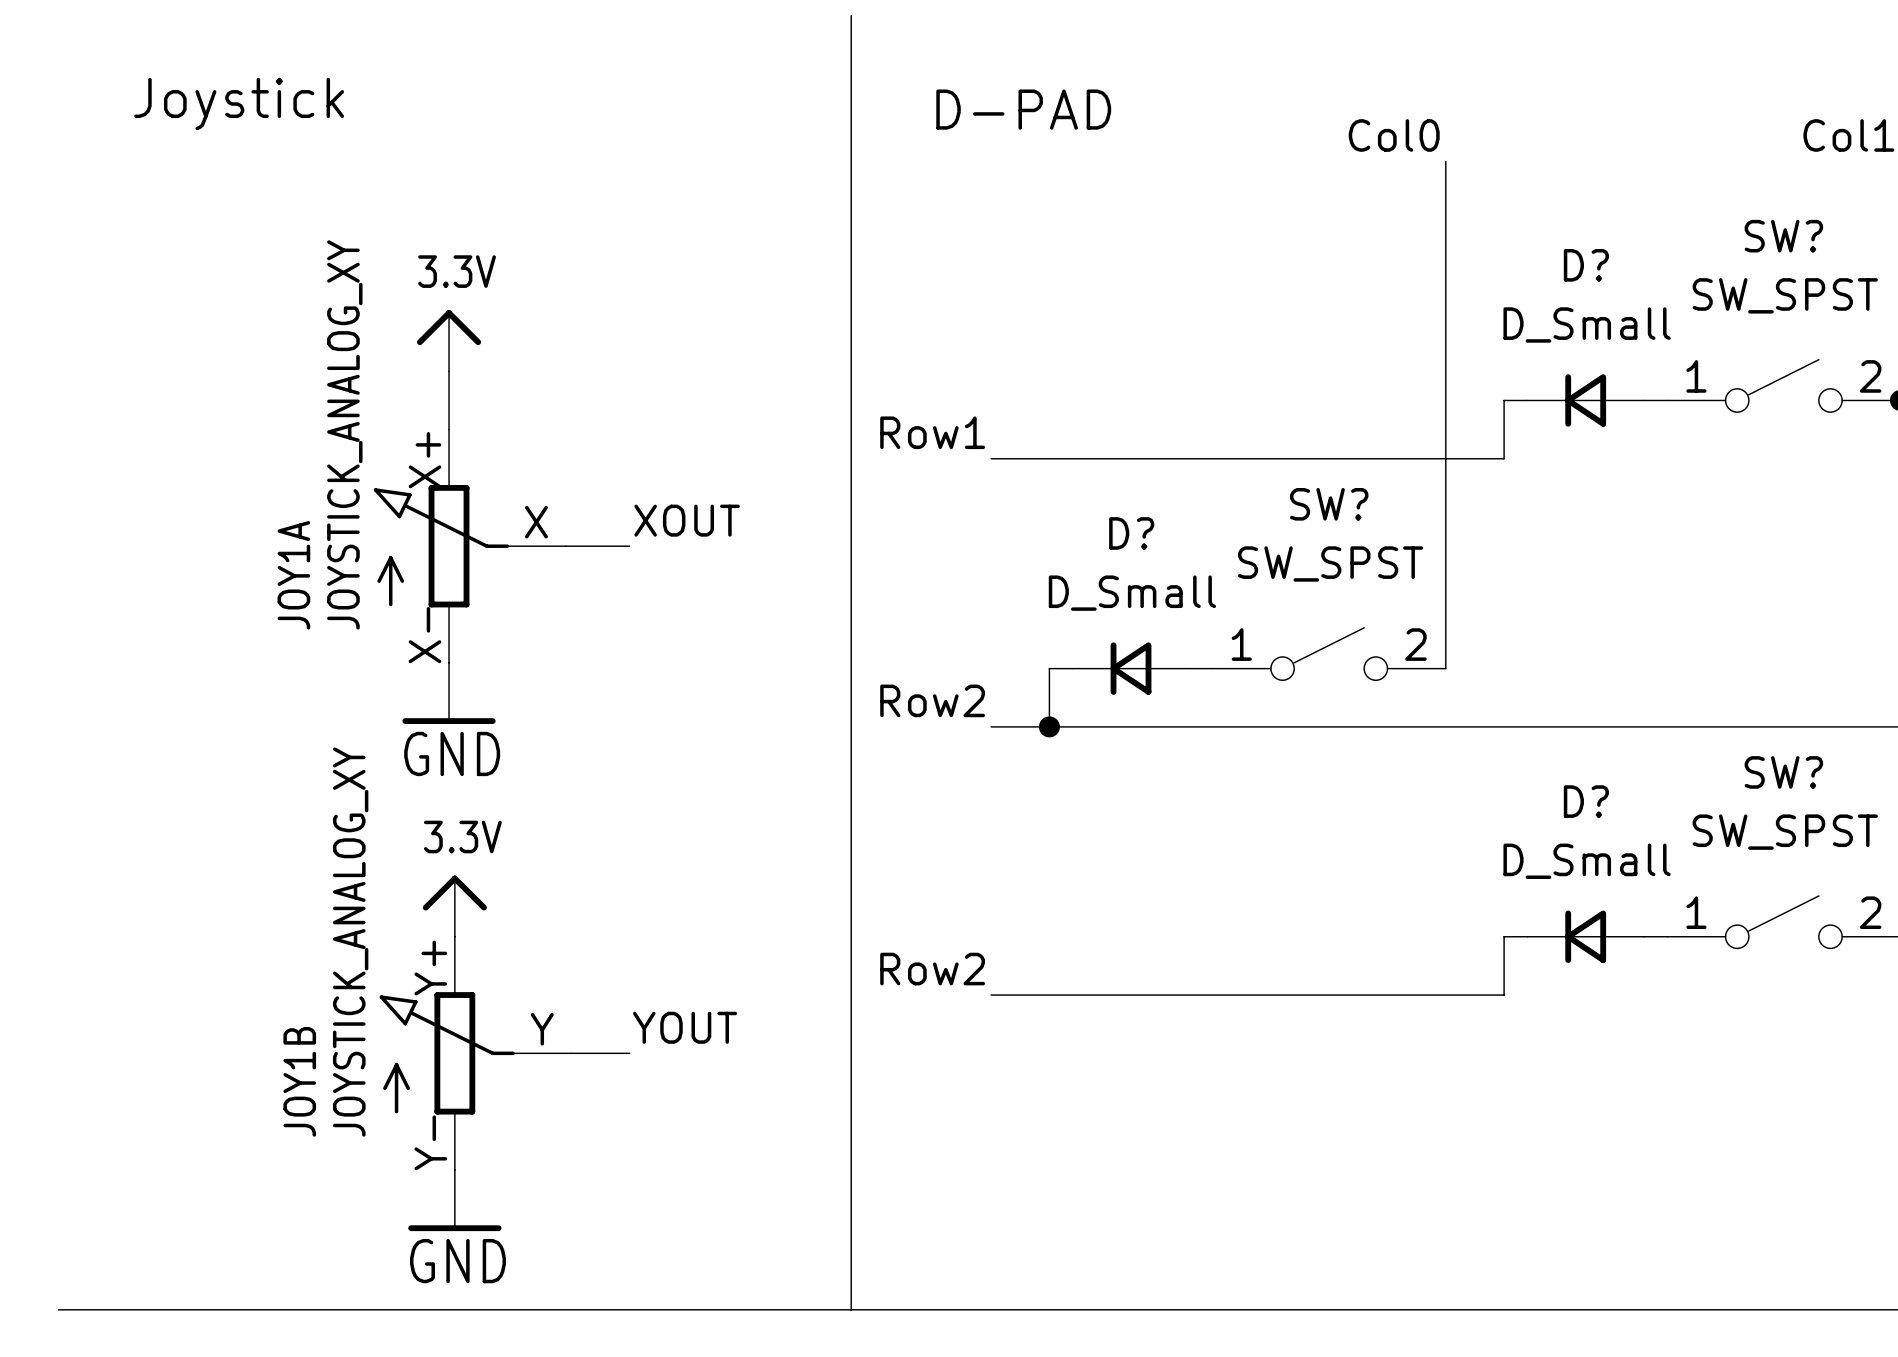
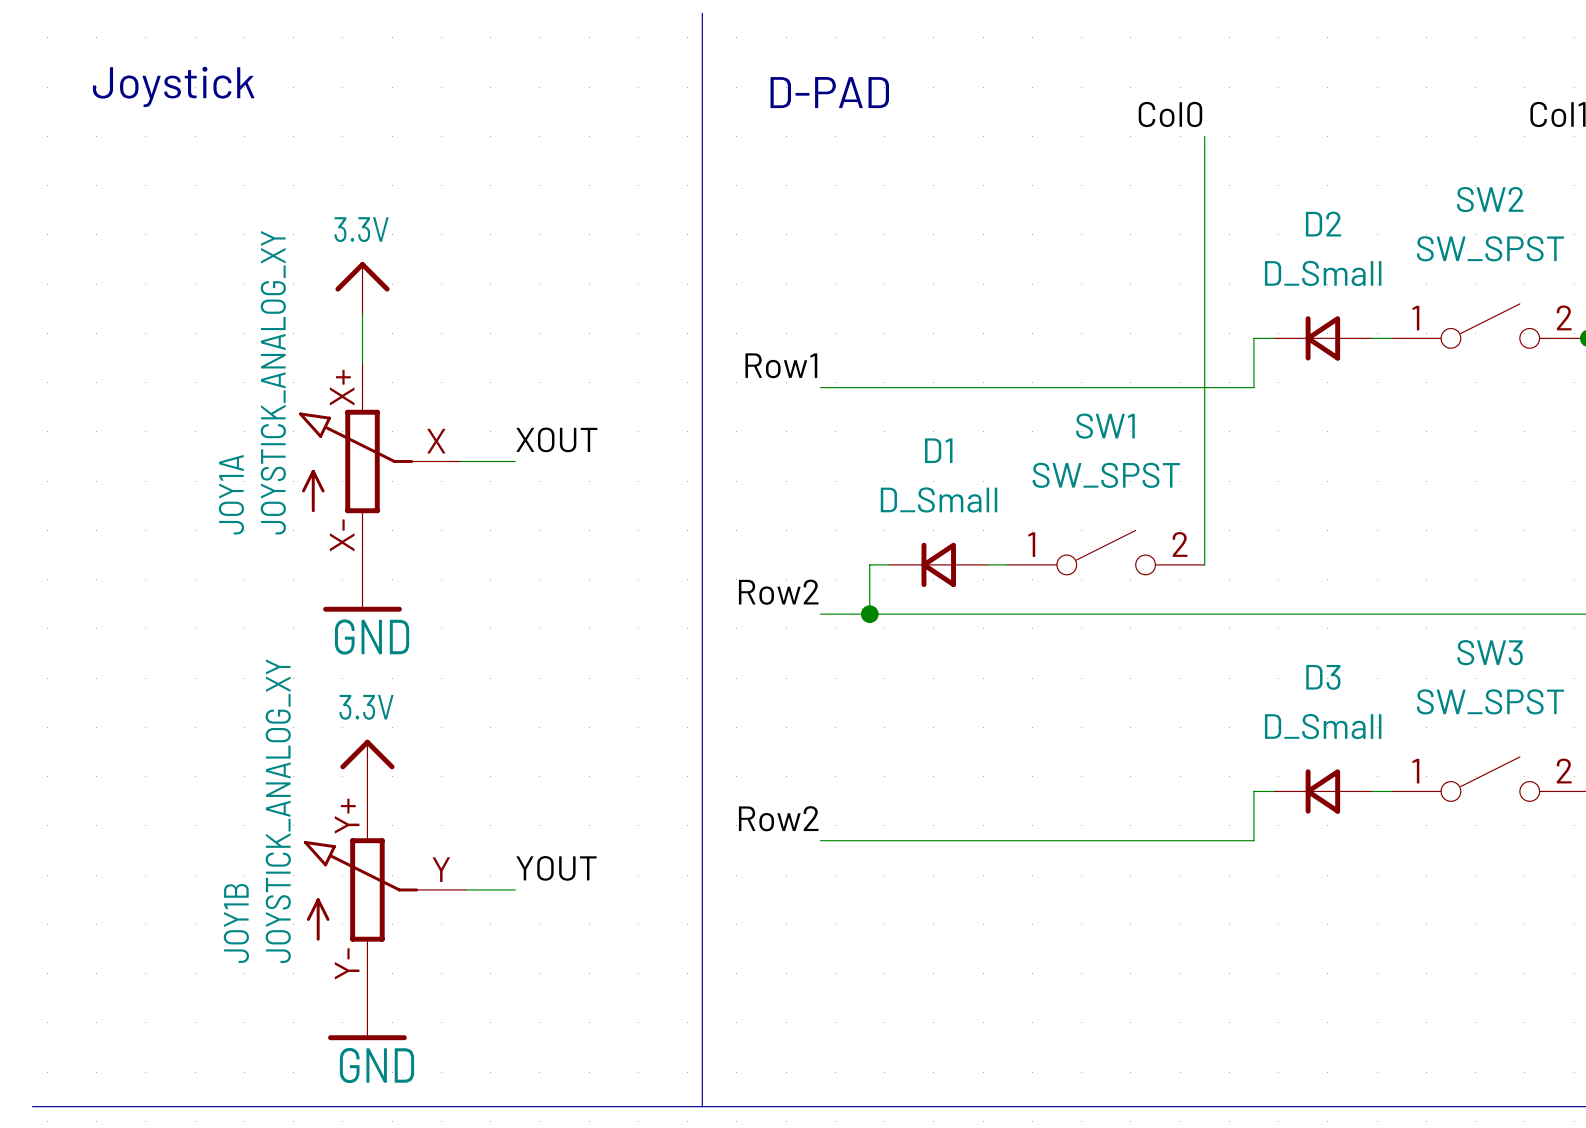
SW? name: SW? (1783, 236) -> SW2 (1490, 199)
D? name: D? (1586, 265) -> D2 (1323, 224)
SW? name: SW? (1329, 504) -> SW1 (1105, 426)
D? name: D? (1131, 533) -> D1 (938, 450)
SW? name: SW? (1783, 772) -> SW3 (1490, 652)
D? name: D? (1586, 801) -> D3 (1323, 677)

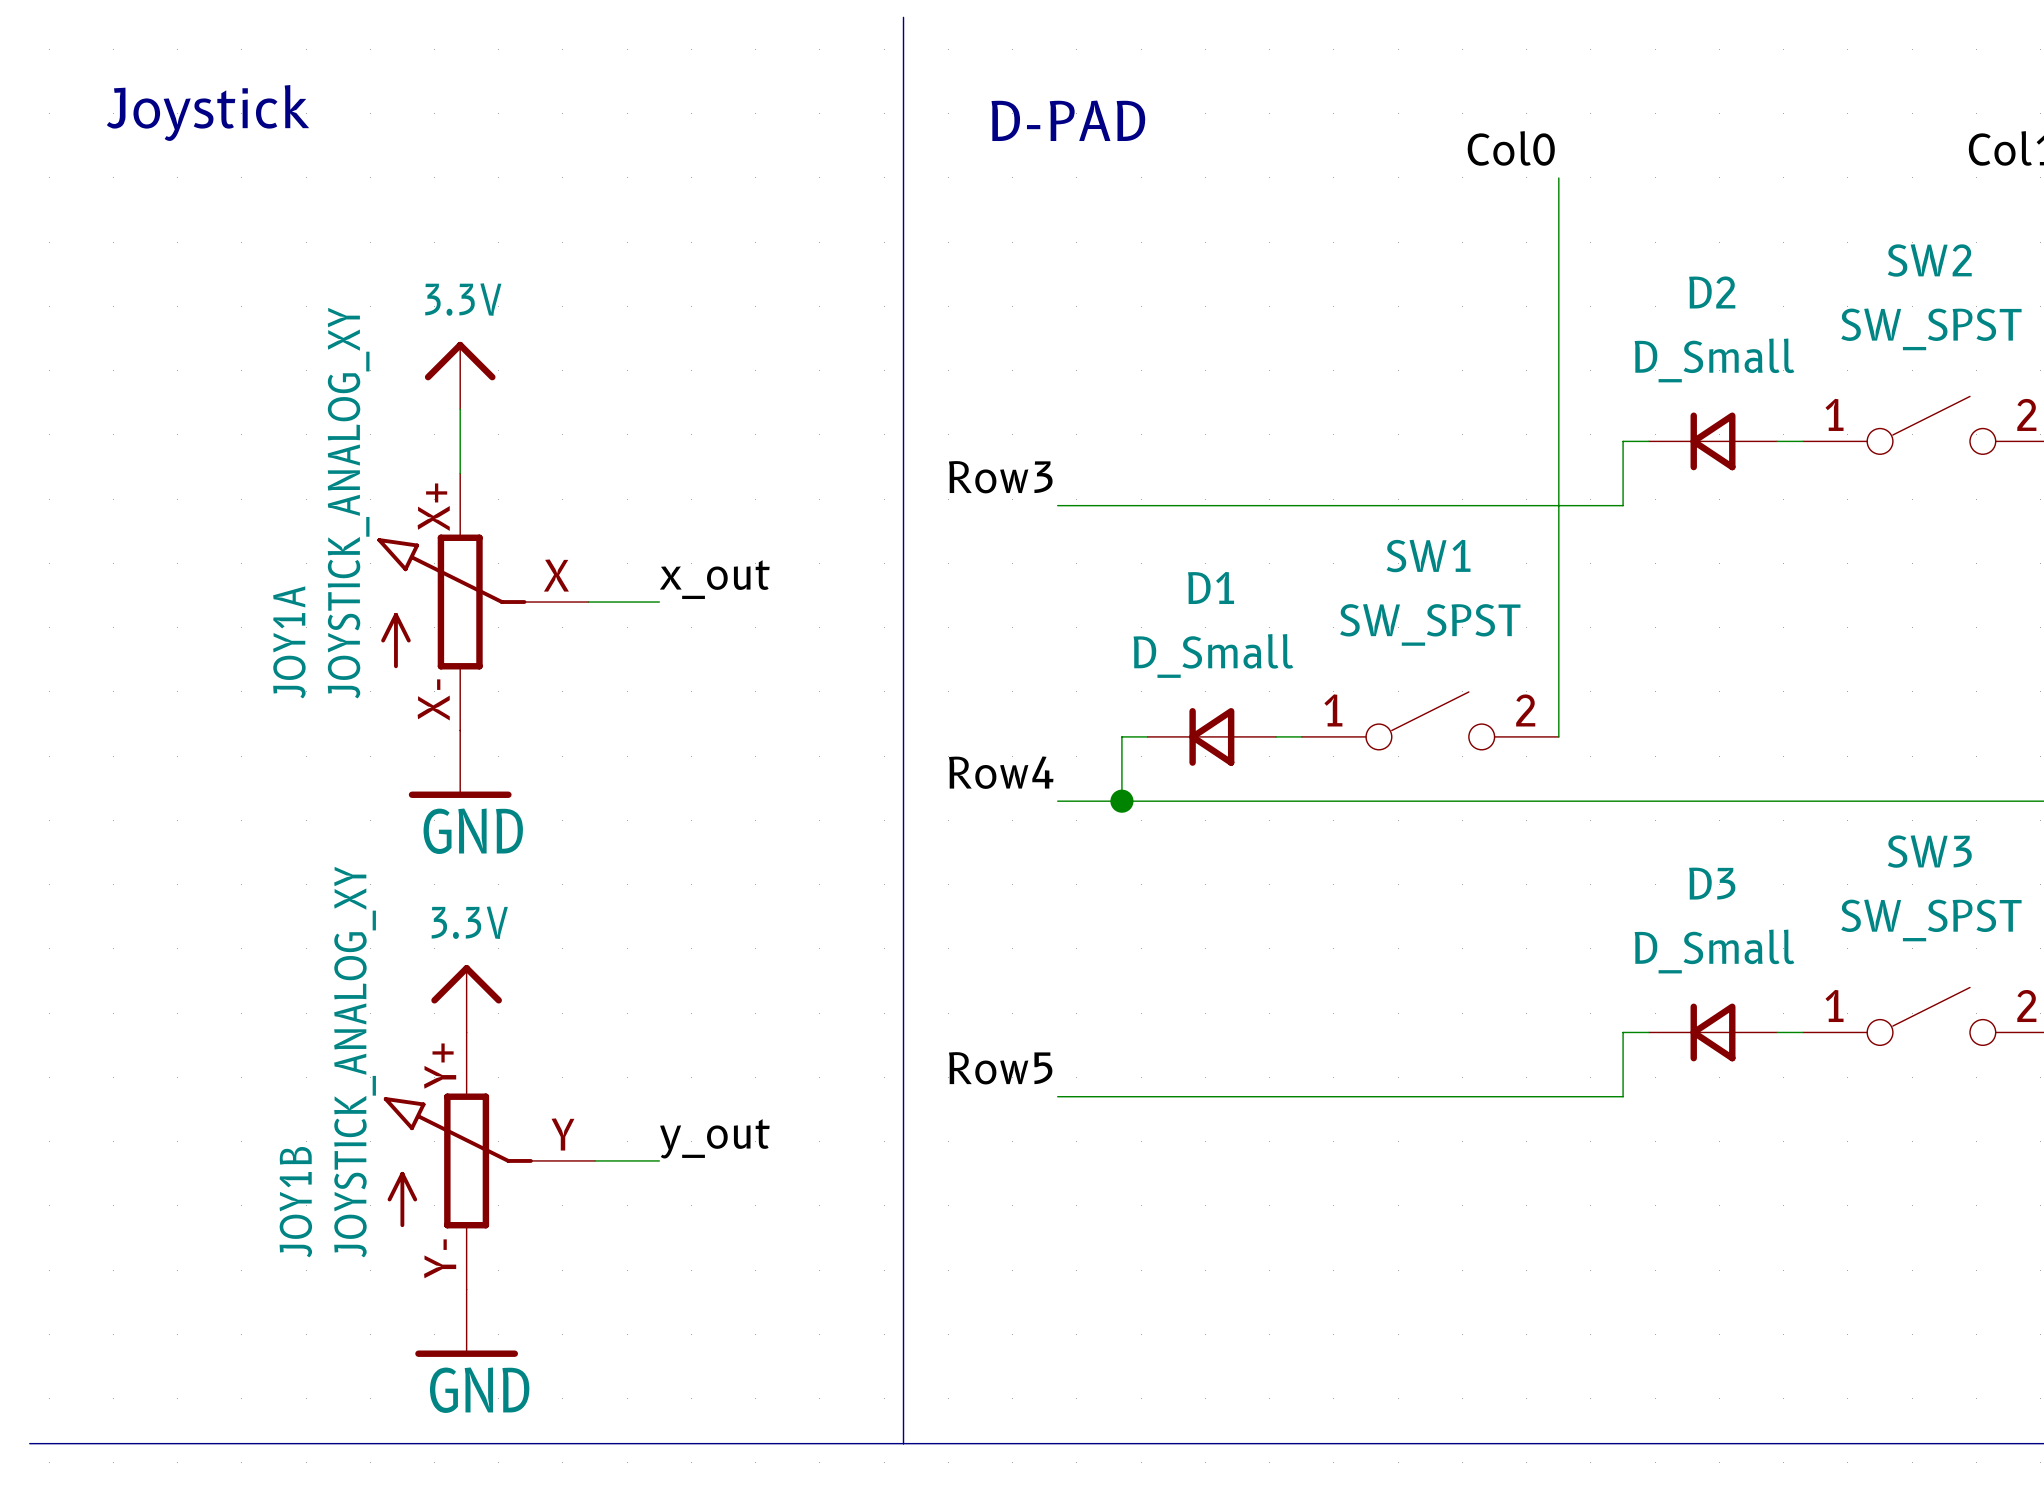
label: Row1 (781, 365) -> Row3 (1000, 477)
label: XOUT (556, 439) -> x_out (714, 579)
label: Row2 (778, 592) -> Row4 (1001, 772)
label: Row2 (778, 818) -> Row5 (1000, 1068)
label: YOUT (556, 868) -> y_out (714, 1138)

